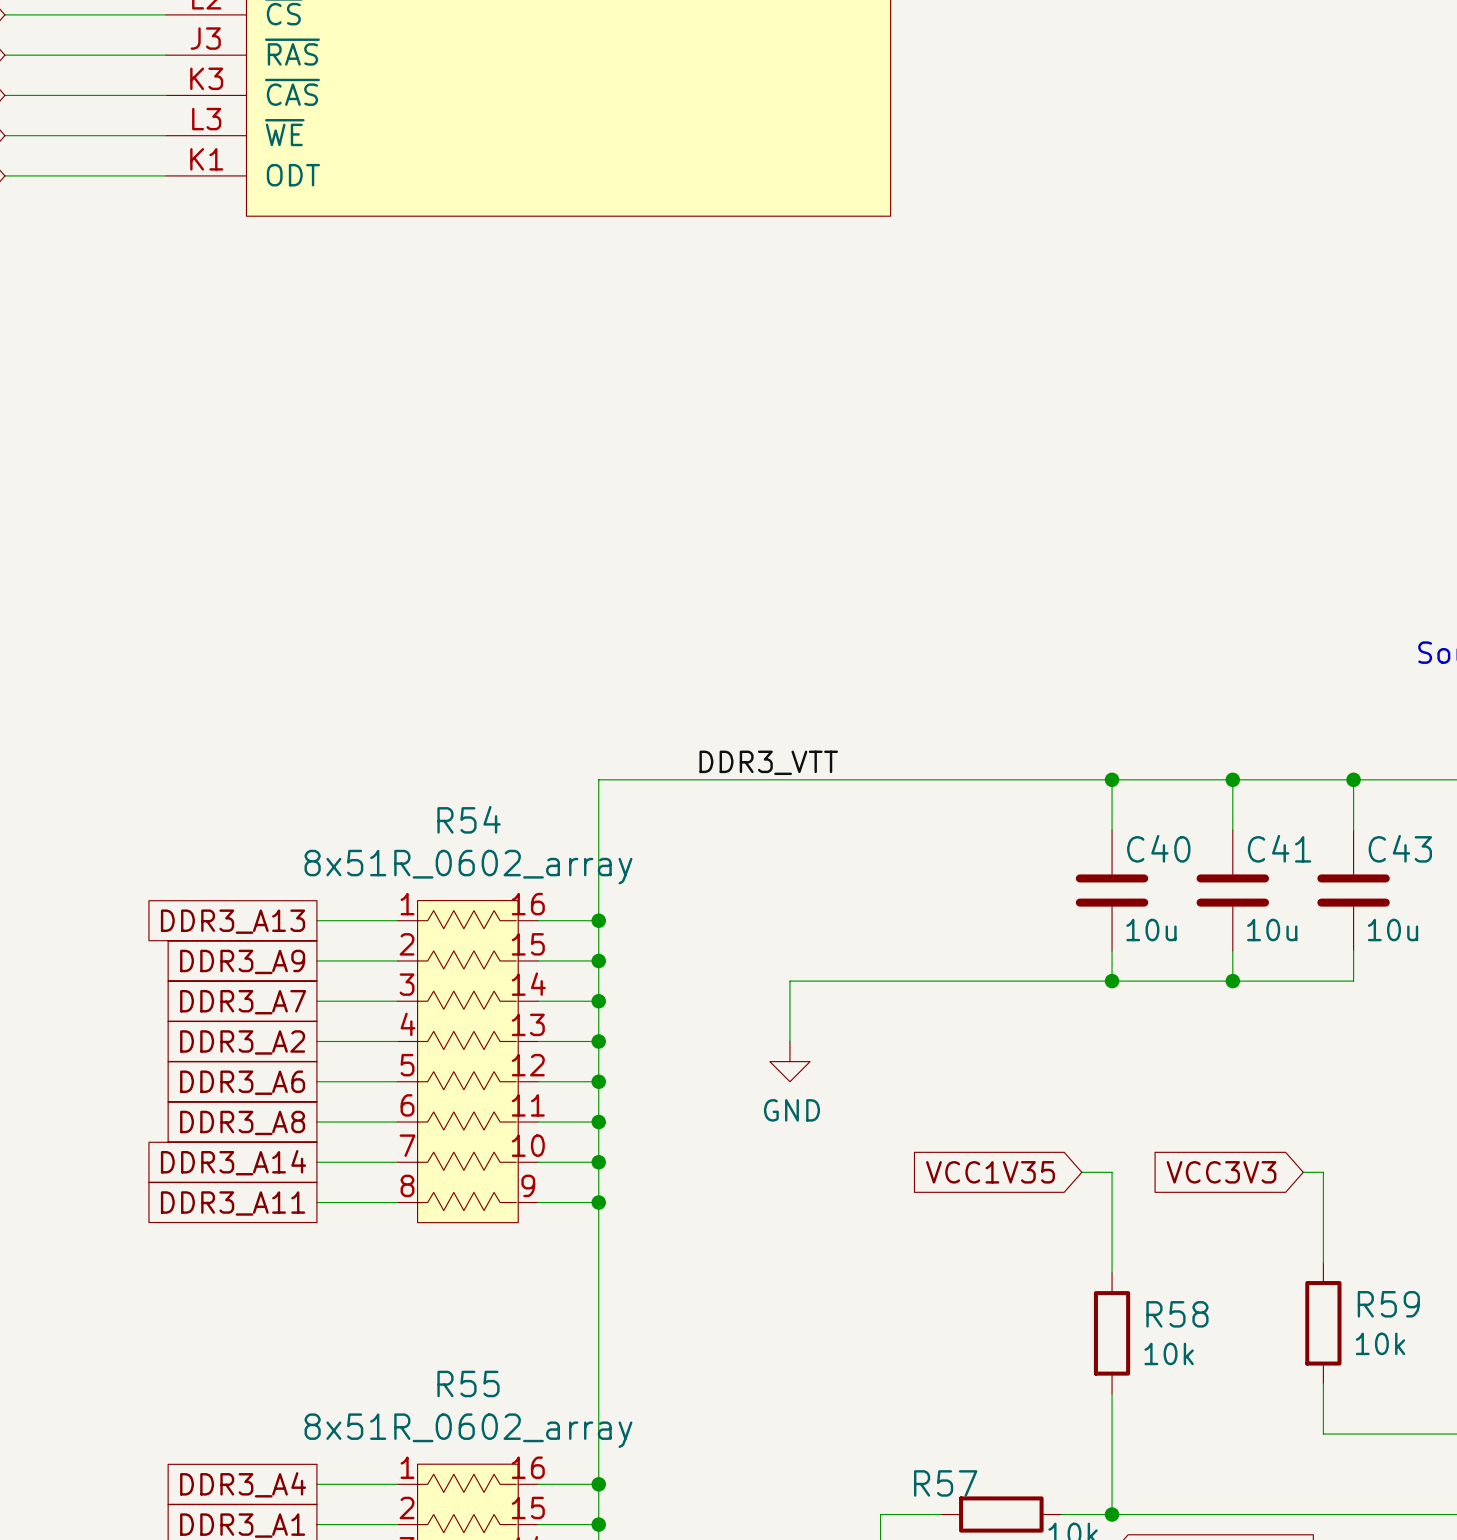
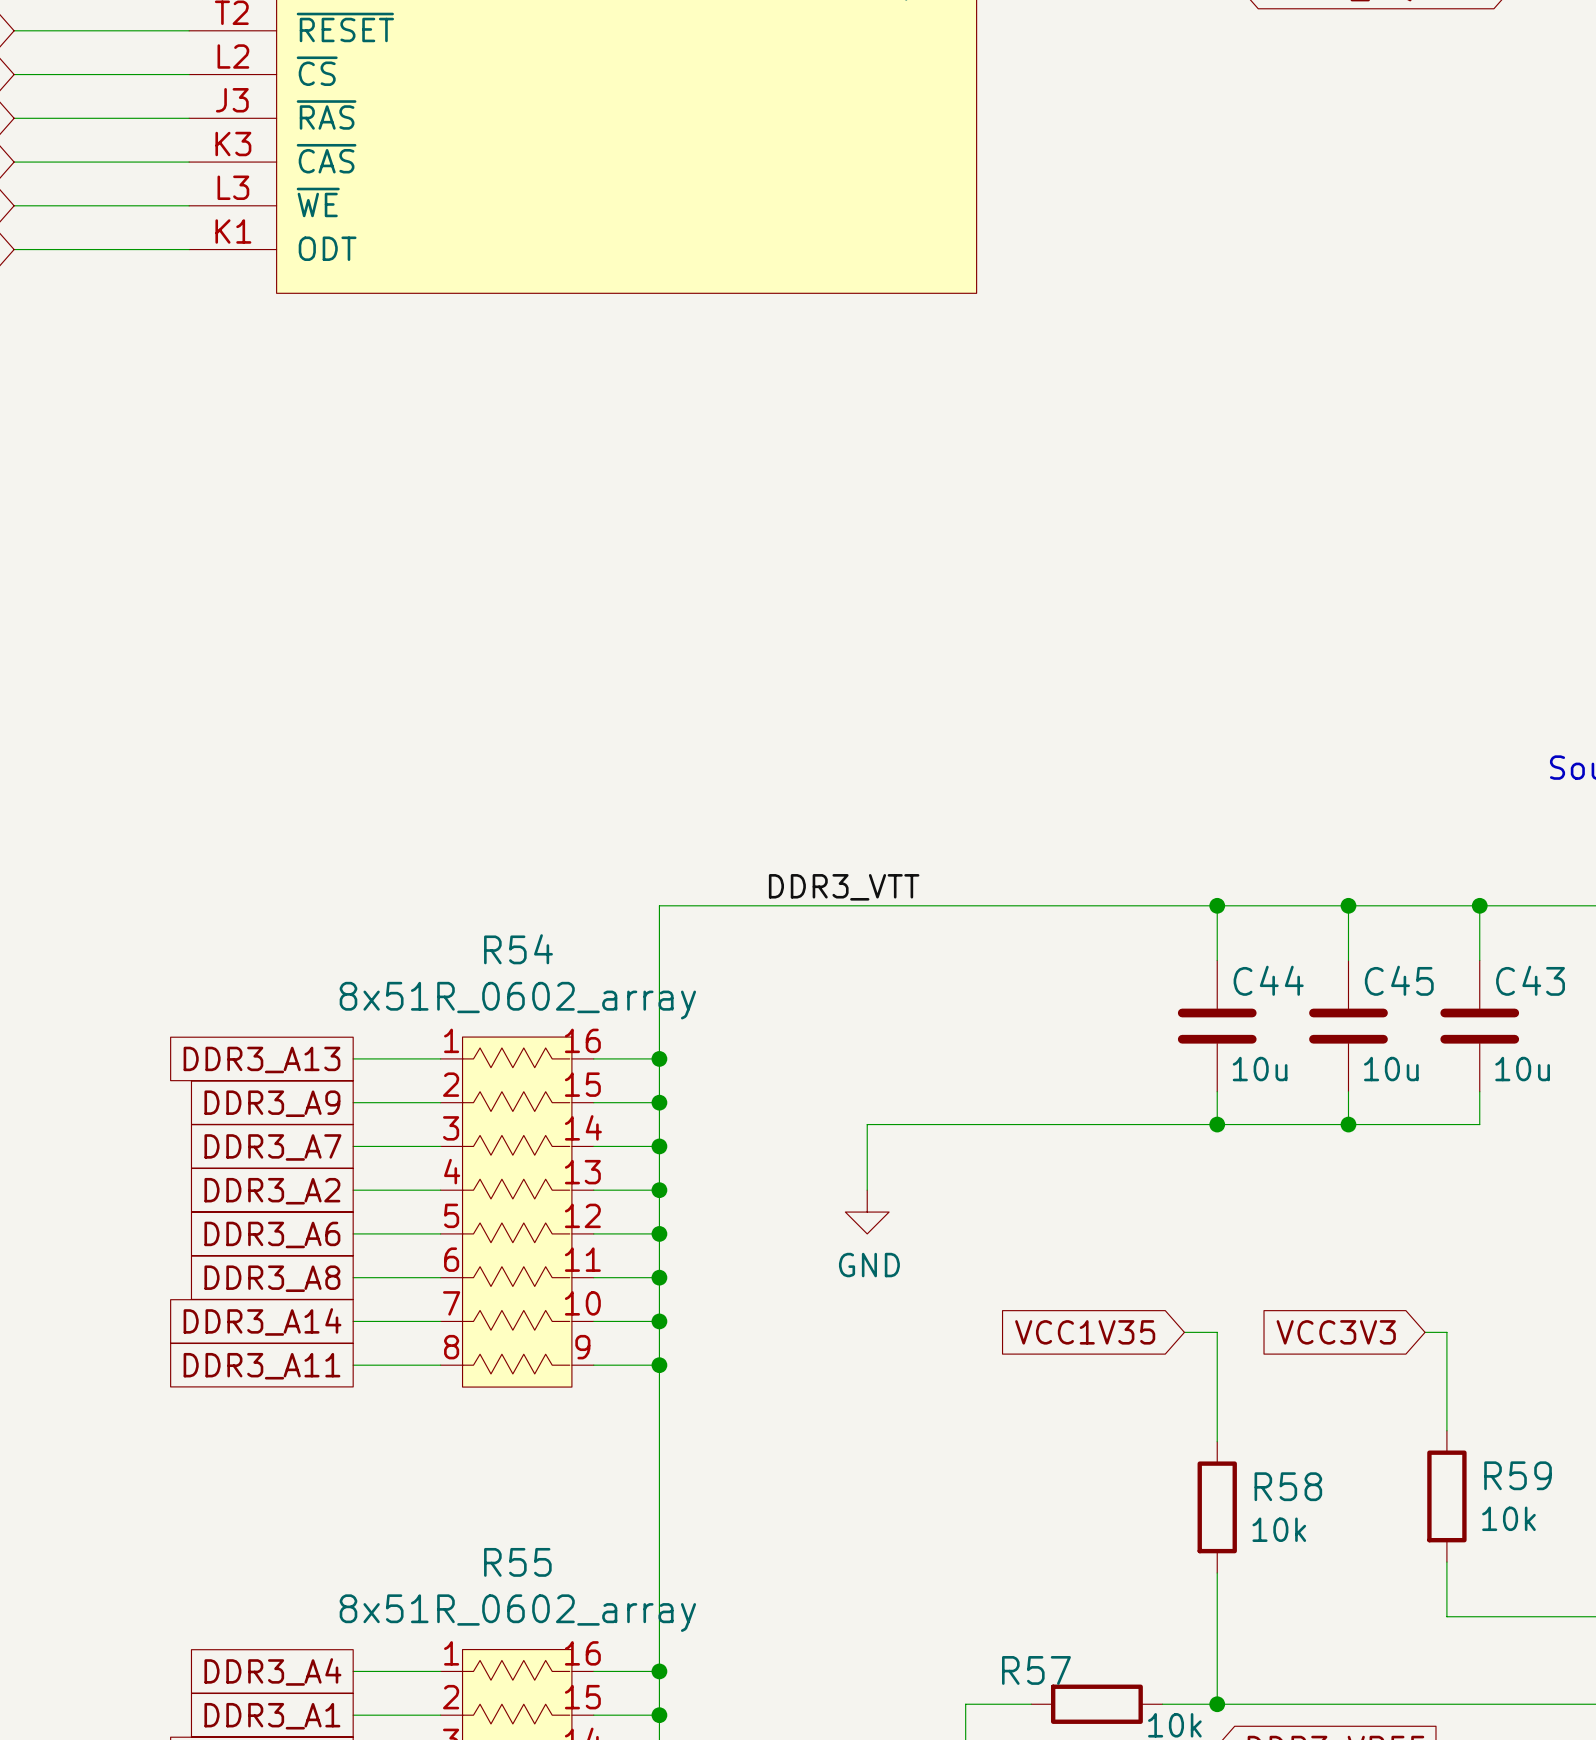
C40 name: C40 (1158, 848) -> C44 (1268, 980)
C41 name: C41 (1279, 848) -> C45 (1399, 980)

